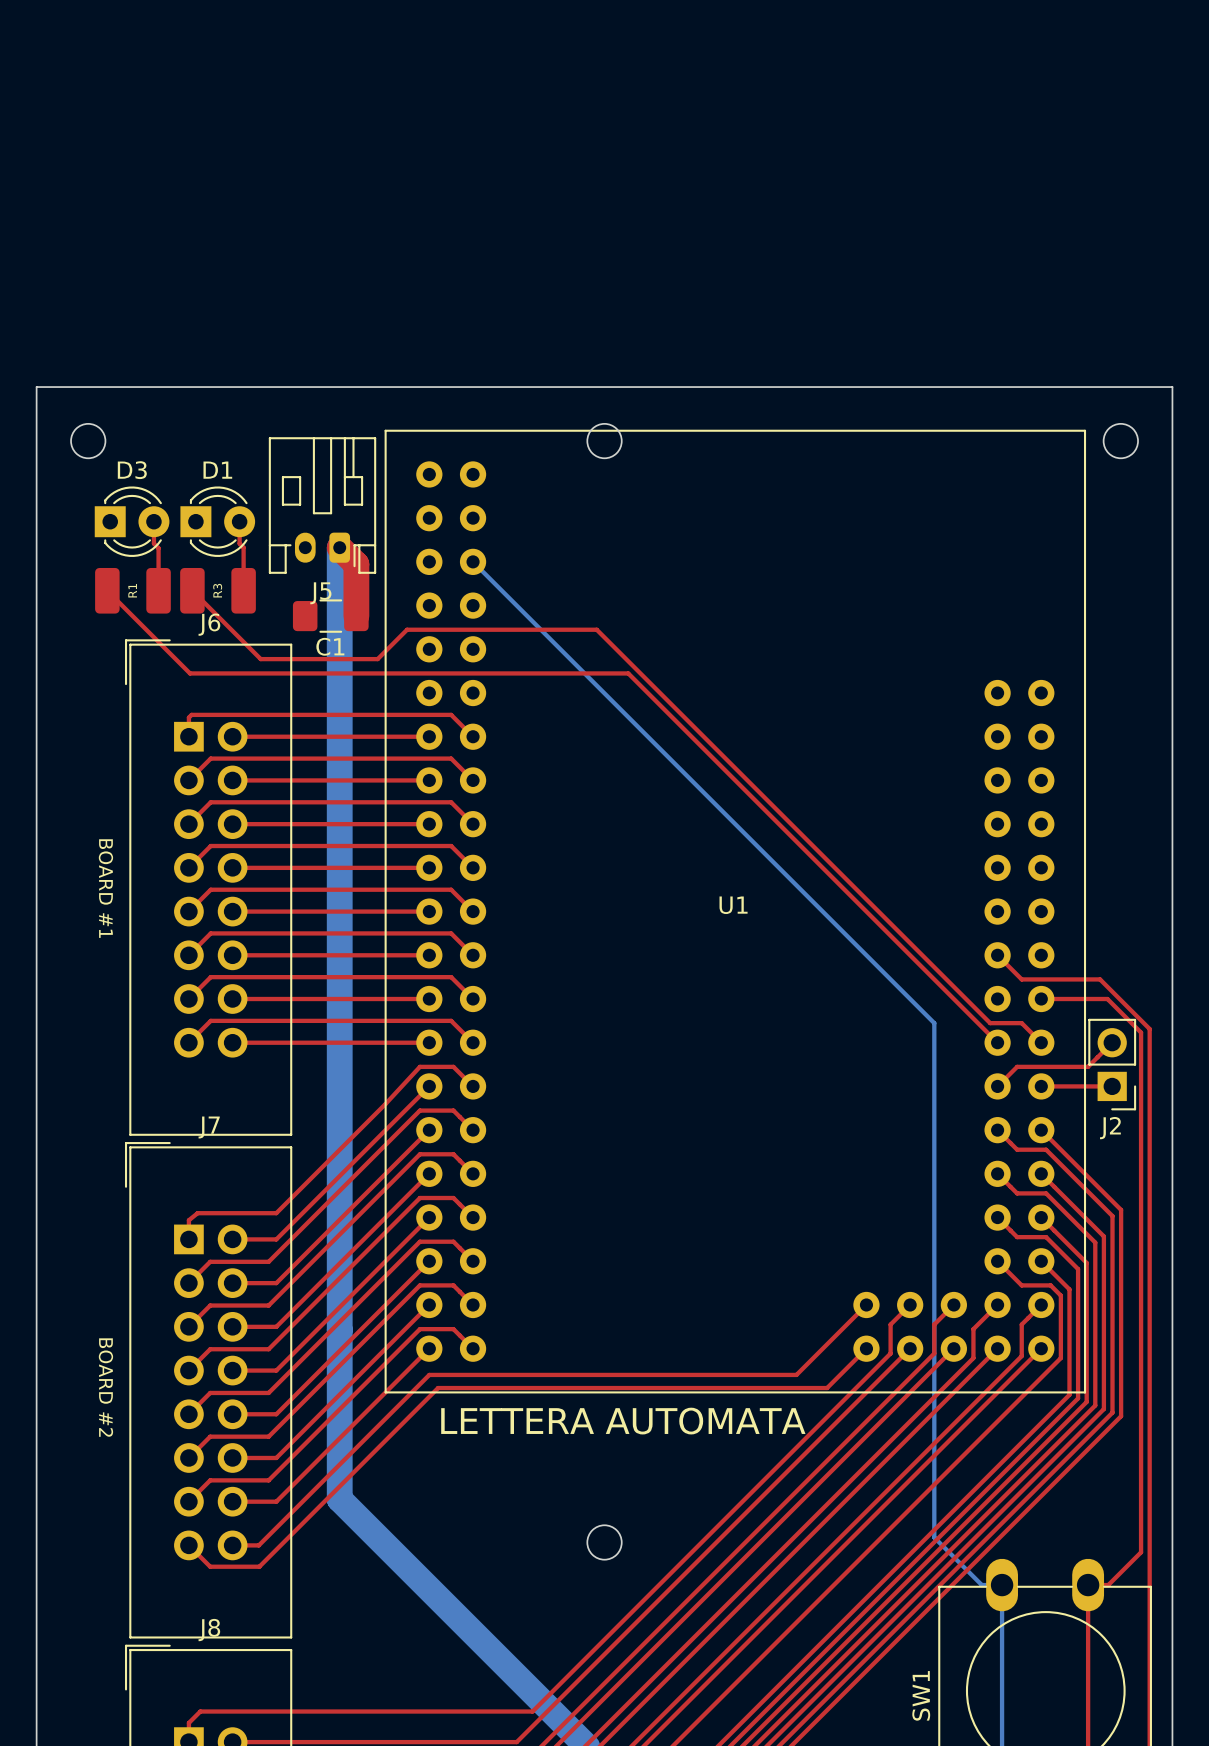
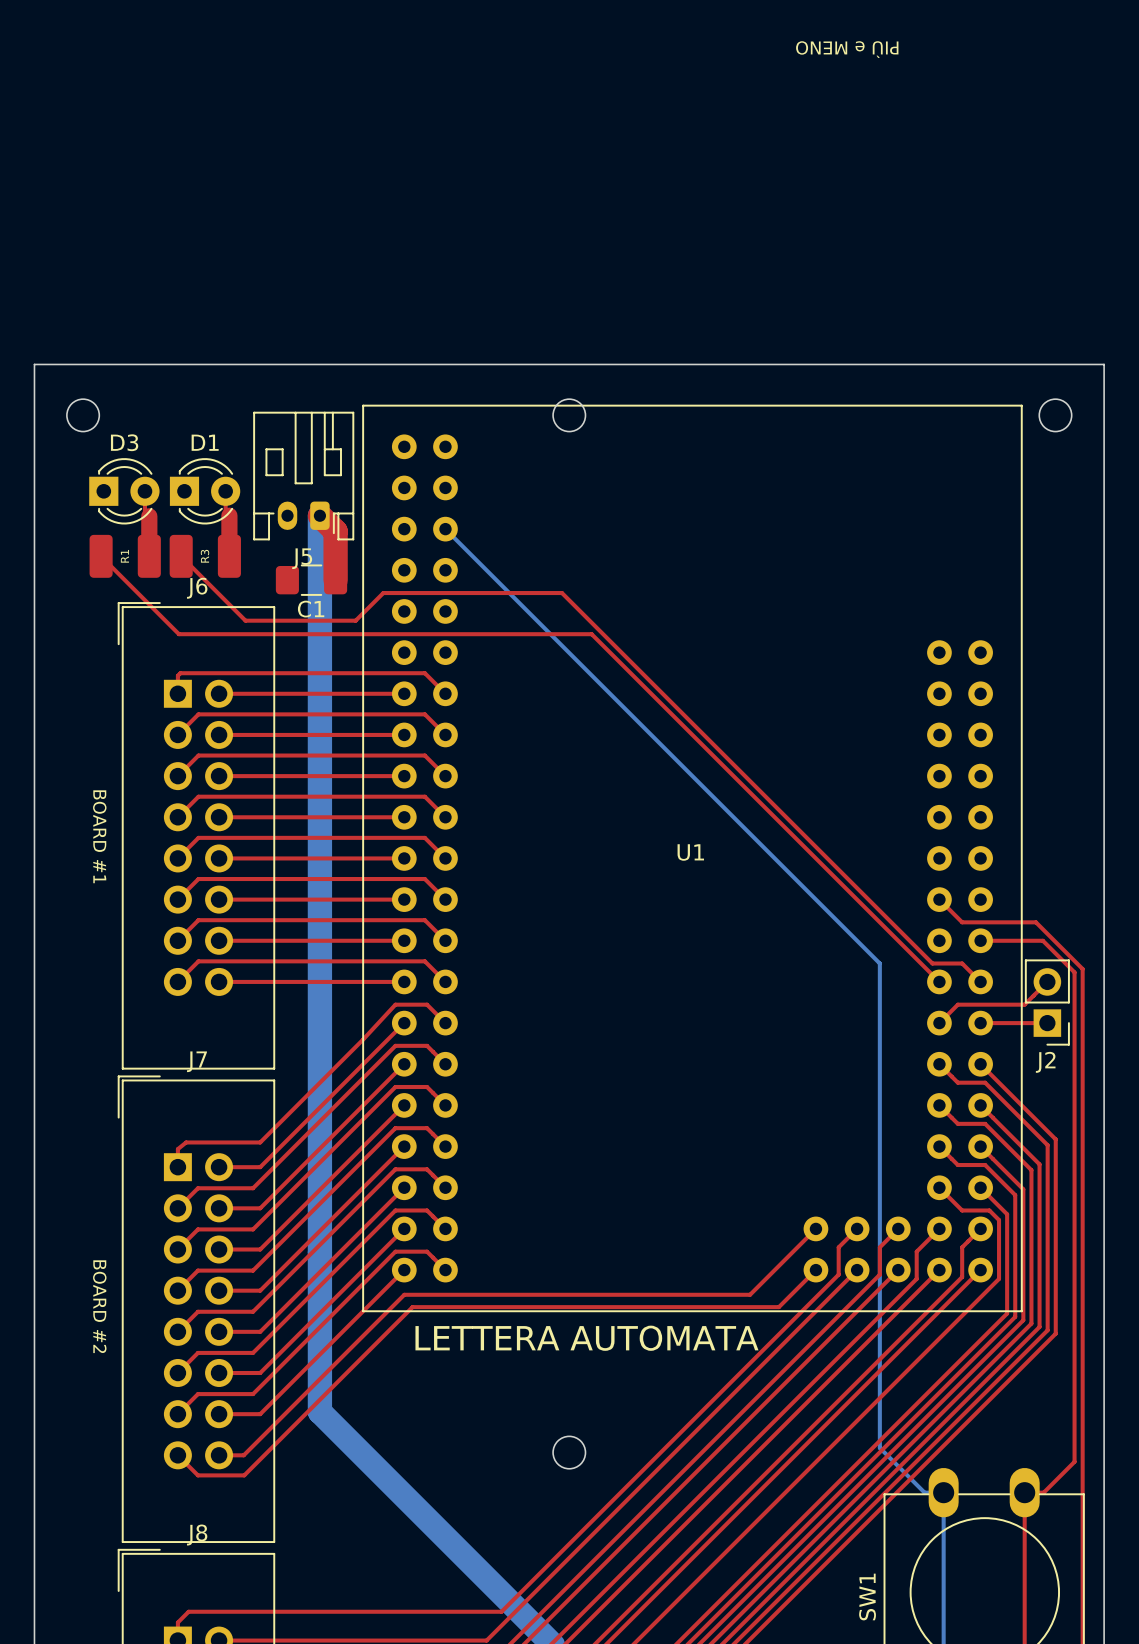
text: none -> PIÙ e MENO (847, 49)
top track width: thin (243, 547) (243, 590) -> thick (229, 515) (229, 556)
top track width: thin (158, 548) (158, 590) -> thick (149, 516) (149, 556)

